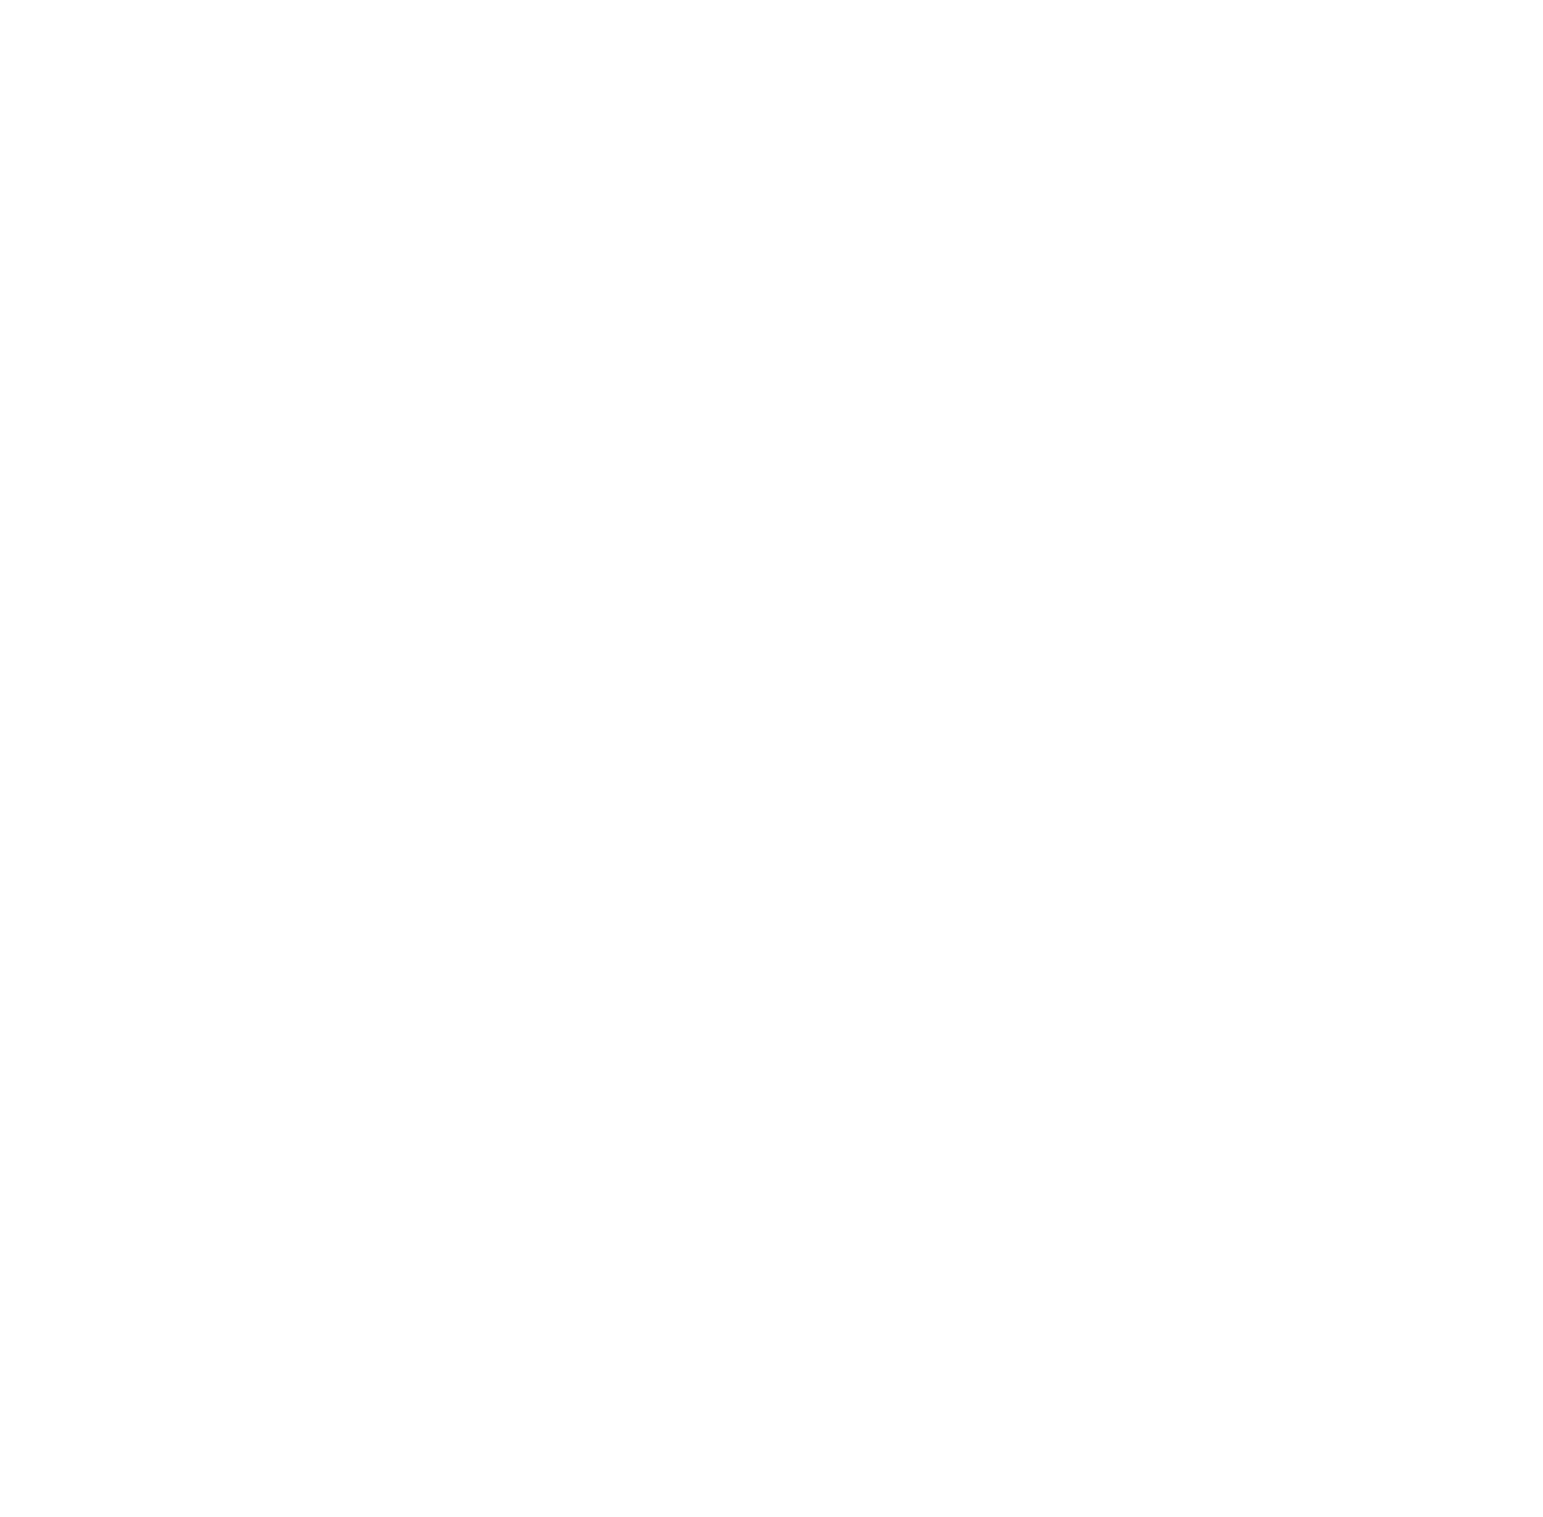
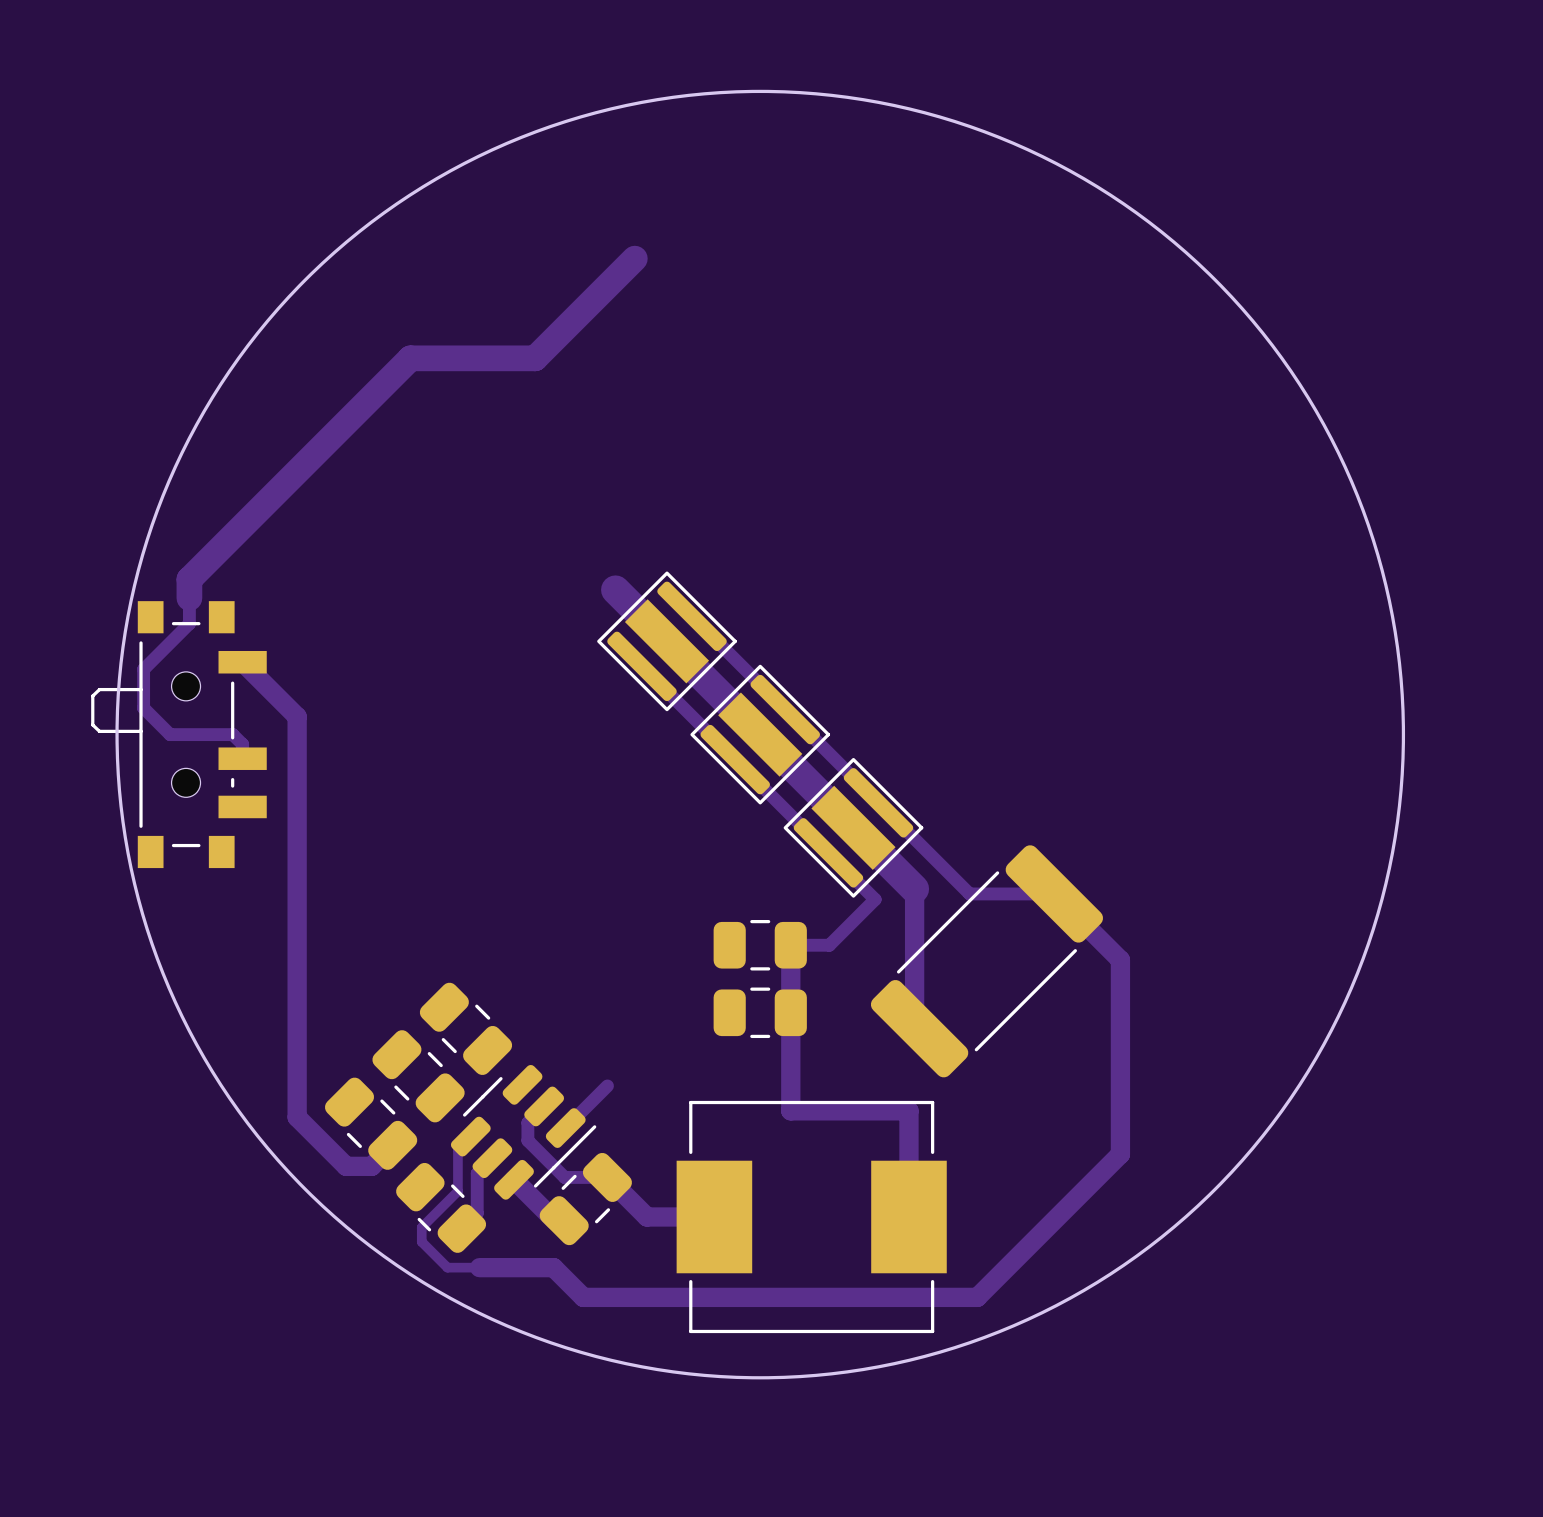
round board edge: none -> [115, 89, 1406, 1380]
track: none -> (634, 258) (535, 358) (410, 358) (189, 579) (189, 623) (143, 669) (143, 708) (170, 734) (232, 734) (242, 744) (242, 758)
track: none -> (615, 589) (914, 888) (914, 1023) (919, 1028)
track: none -> (692, 616) (969, 893) (1054, 893) (1120, 960) (1120, 1154) (977, 1297) (583, 1297) (553, 1267) (447, 1267) (421, 1241) (421, 1227) (457, 1191) (457, 1149) (470, 1136)
part: none -> (667, 641)
track: none -> (242, 662) (297, 716) (297, 1117) (346, 1166) (371, 1166) (392, 1145)
track: none -> (641, 666) (875, 899) (829, 945) (790, 945) (790, 1110) (908, 1110) (908, 1216)
part: none -> (178, 734)
part: none -> (760, 734)
part: none -> (853, 827)
part: none -> (760, 945)
part: none -> (986, 961)
part: none -> (760, 1012)
part: none -> (465, 1028)
part: none -> (418, 1076)
track: none -> (607, 1085) (565, 1127)
track: none -> (544, 1106) (527, 1122) (527, 1140) (564, 1177) (607, 1177) (646, 1216) (714, 1216)
part: none -> (371, 1123)
part: none -> (523, 1132)
track: none -> (492, 1158) (477, 1173) (477, 1213) (461, 1228)
track: none -> (514, 1179) (554, 1220) (564, 1220)
part: none -> (585, 1199)
part: none -> (441, 1207)
part: none -> (811, 1216)

